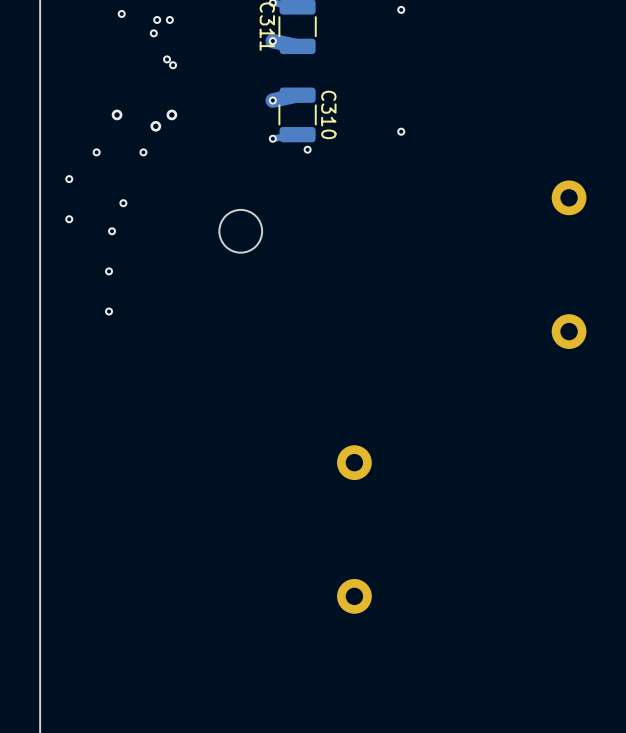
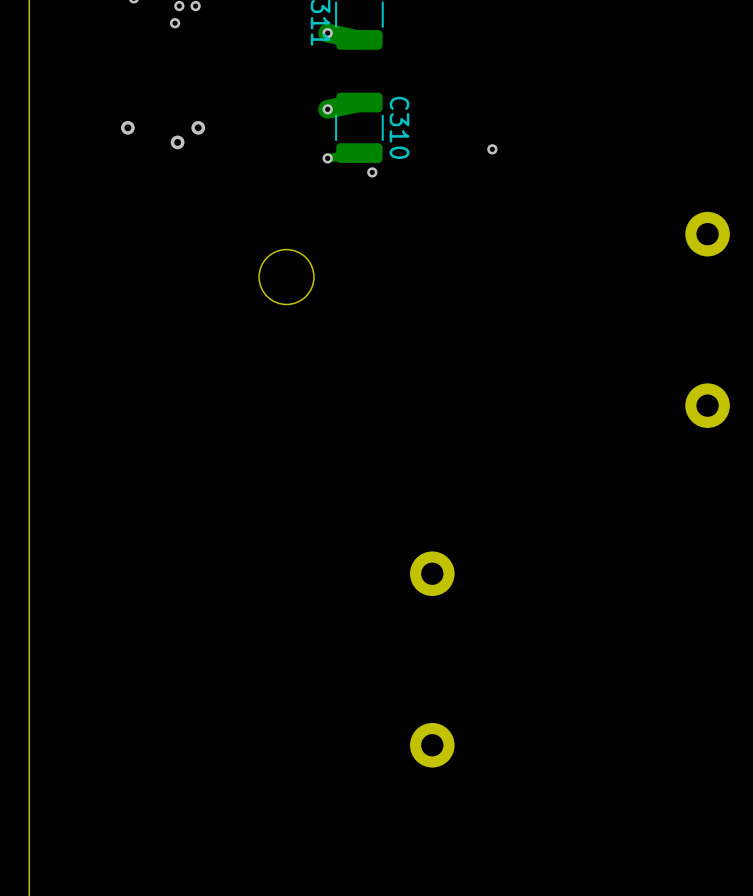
via: (167, 59) -> none
via: (173, 65) -> none
via: (96, 152) -> none
via: (143, 152) -> none
via: (69, 179) -> none
via: (123, 203) -> none
via: (69, 219) -> none
via: (112, 231) -> none
via: (109, 271) -> none
via: (109, 311) -> none

